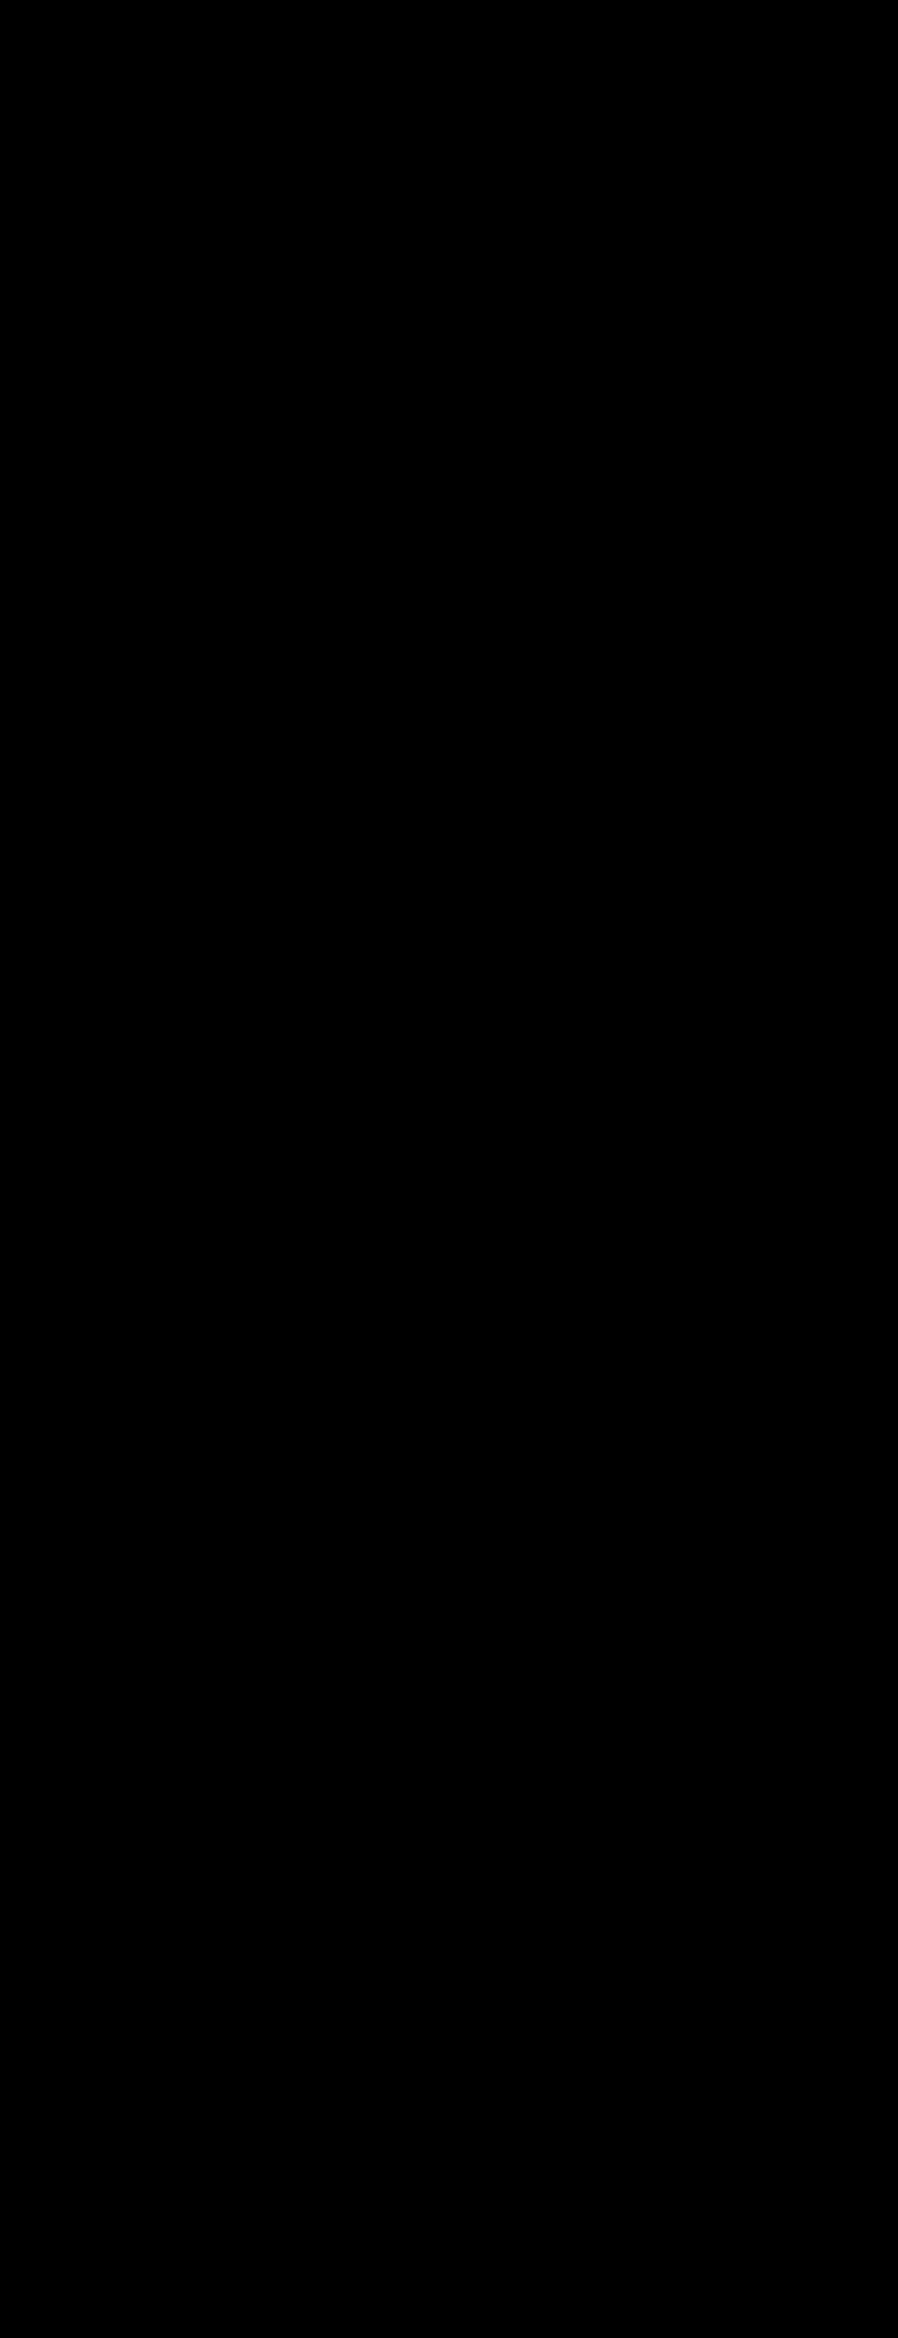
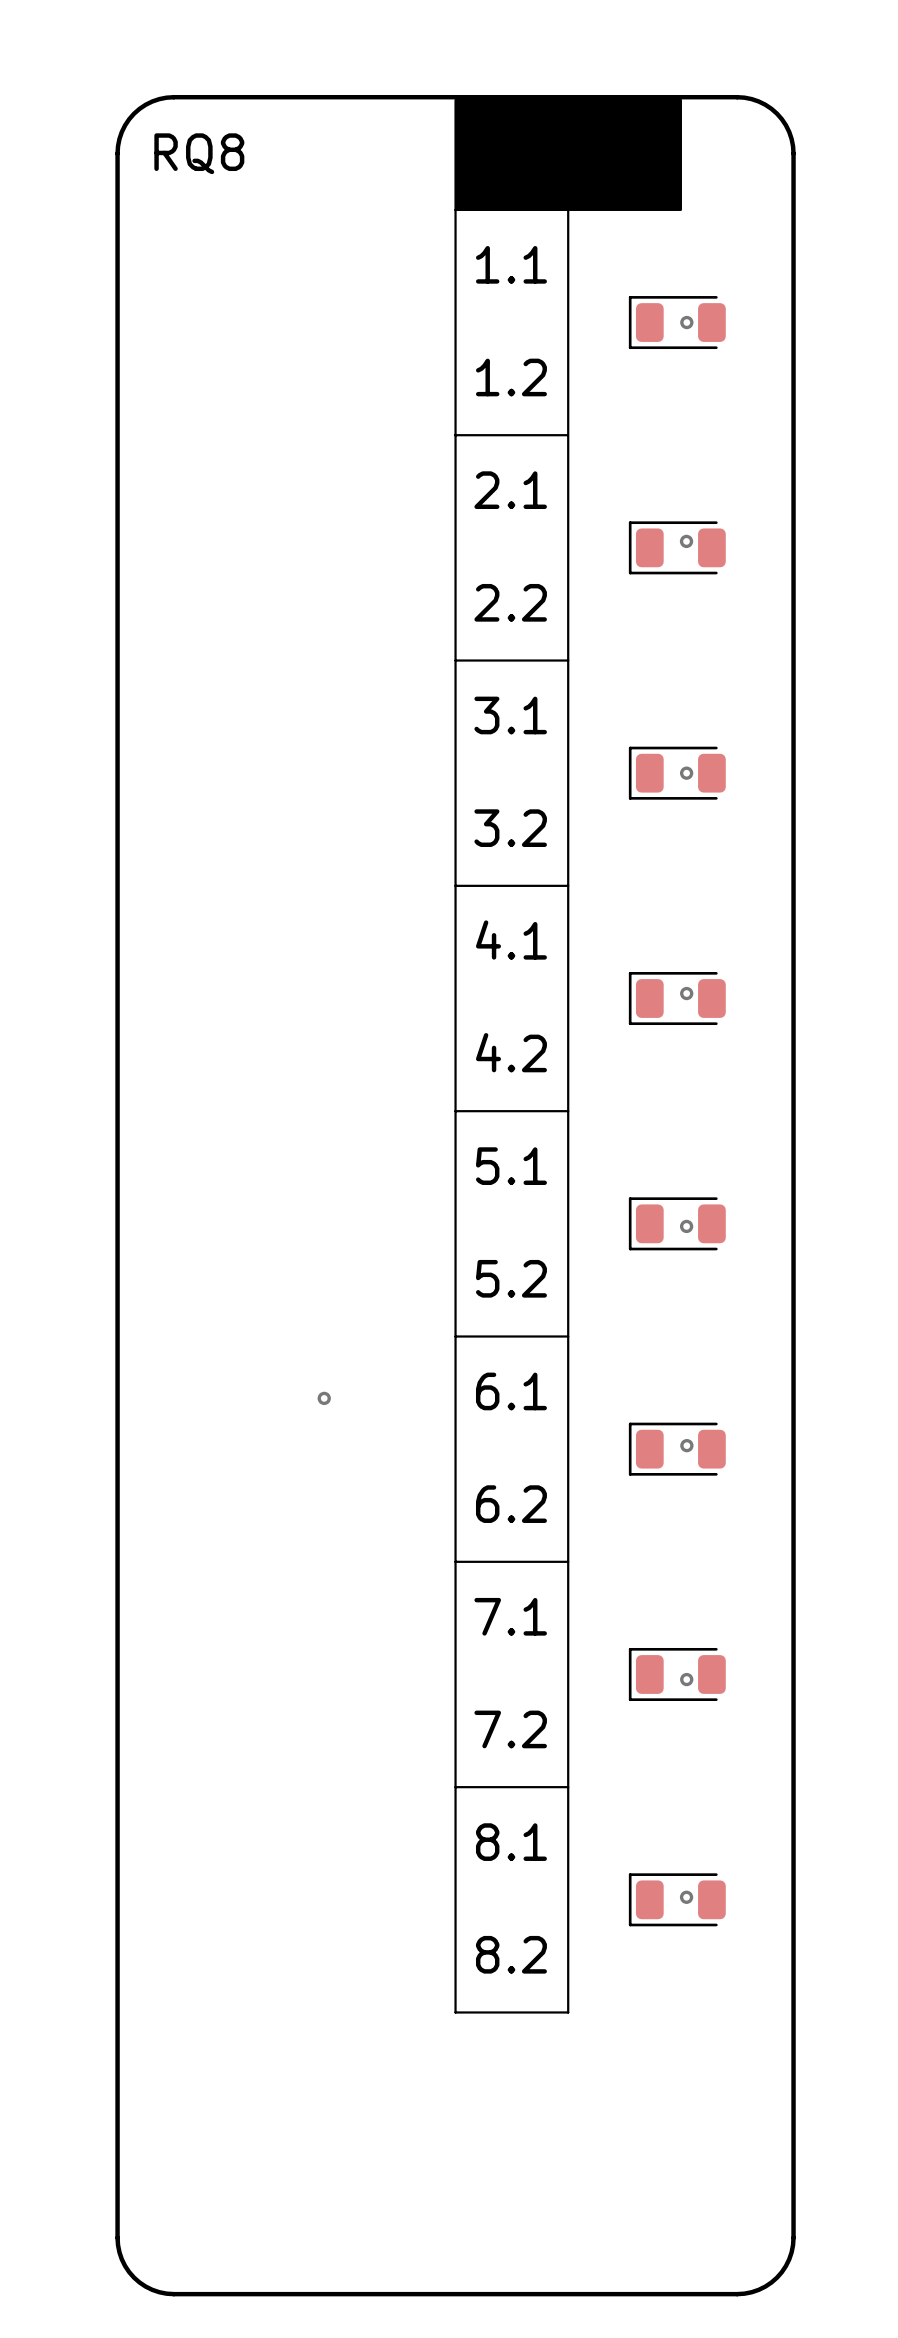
board edge: none -> (173, 97) (744, 97) (765, 104) (777, 113) (785, 125) (791, 138) (793, 153) (793, 2237) (789, 2259) (781, 2272) (765, 2286) (751, 2292) (737, 2294) (173, 2294) (159, 2292) (139, 2282) (125, 2265) (119, 2252) (117, 2237) (117, 153) (121, 131) (134, 113) (152, 101) (173, 97)
drawing: none -> [454, 98, 682, 211]
text: none -> RQ8 (199, 153)
line: none -> (455, 209) (568, 209) (568, 2012) (455, 2012) (455, 209)
text: none -> 1.1 (511, 264)
part: none -> (677, 322)
via: none -> (686, 322)
text: none -> 1.2 (511, 377)
line: none -> (454, 435) (567, 435)
text: none -> 2.1 (510, 490)
via: none -> (686, 541)
part: none -> (677, 547)
text: none -> 2.2 (510, 602)
line: none -> (455, 660) (568, 660)
text: none -> 3.1 (510, 715)
part: none -> (677, 773)
via: none -> (686, 773)
text: none -> 3.2 (510, 828)
line: none -> (455, 885) (568, 885)
text: none -> 4.1 (511, 940)
via: none -> (686, 993)
part: none -> (677, 998)
text: none -> 4.2 (511, 1052)
line: none -> (455, 1111) (568, 1111)
text: none -> 5.1 (511, 1166)
part: none -> (677, 1223)
via: none -> (686, 1226)
text: none -> 5.2 (511, 1278)
line: none -> (455, 1336) (568, 1336)
text: none -> 6.1 (511, 1391)
via: none -> (324, 1398)
via: none -> (686, 1445)
part: none -> (677, 1449)
text: none -> 6.2 (511, 1504)
line: none -> (455, 1561) (568, 1561)
text: none -> 7.1 (510, 1616)
part: none -> (677, 1674)
via: none -> (686, 1679)
text: none -> 7.2 (510, 1729)
line: none -> (455, 1787) (568, 1787)
text: none -> 8.1 (511, 1842)
via: none -> (686, 1897)
part: none -> (677, 1899)
text: none -> 8.2 (511, 1954)

